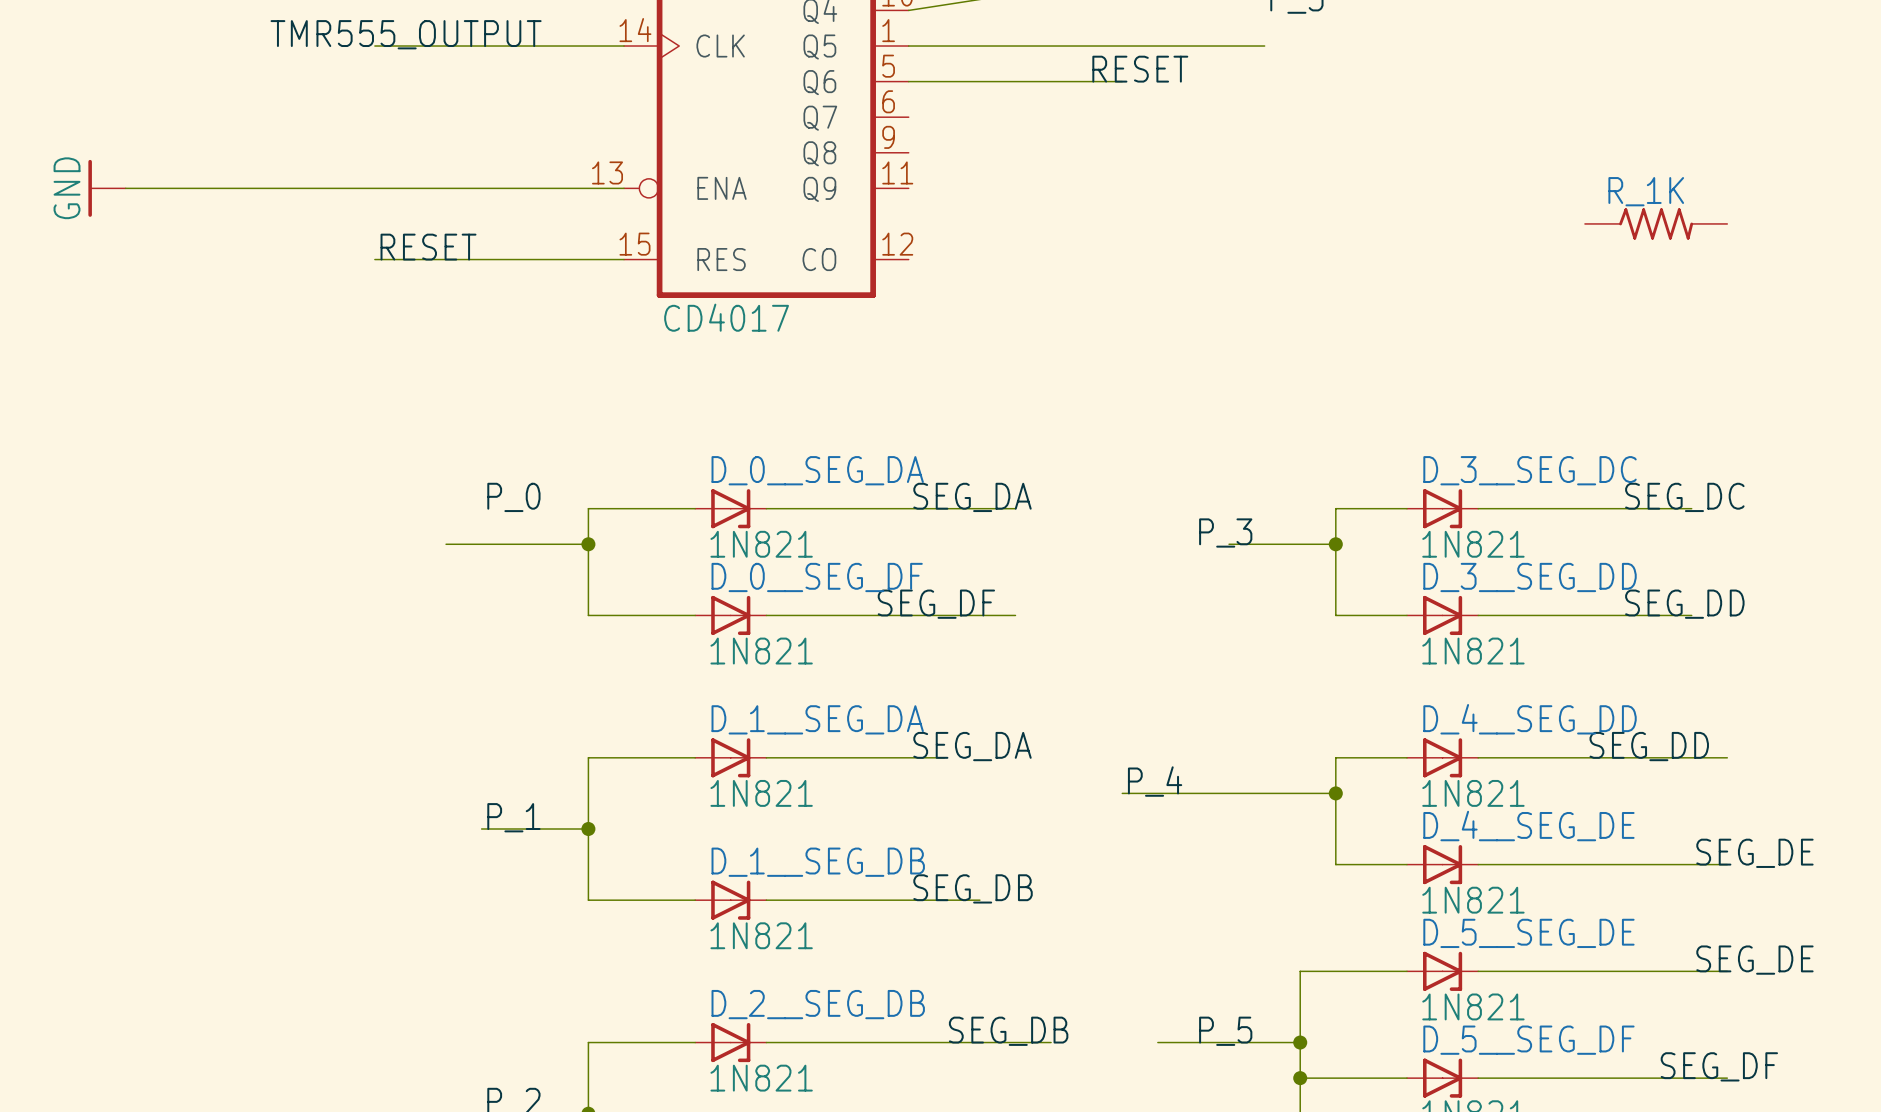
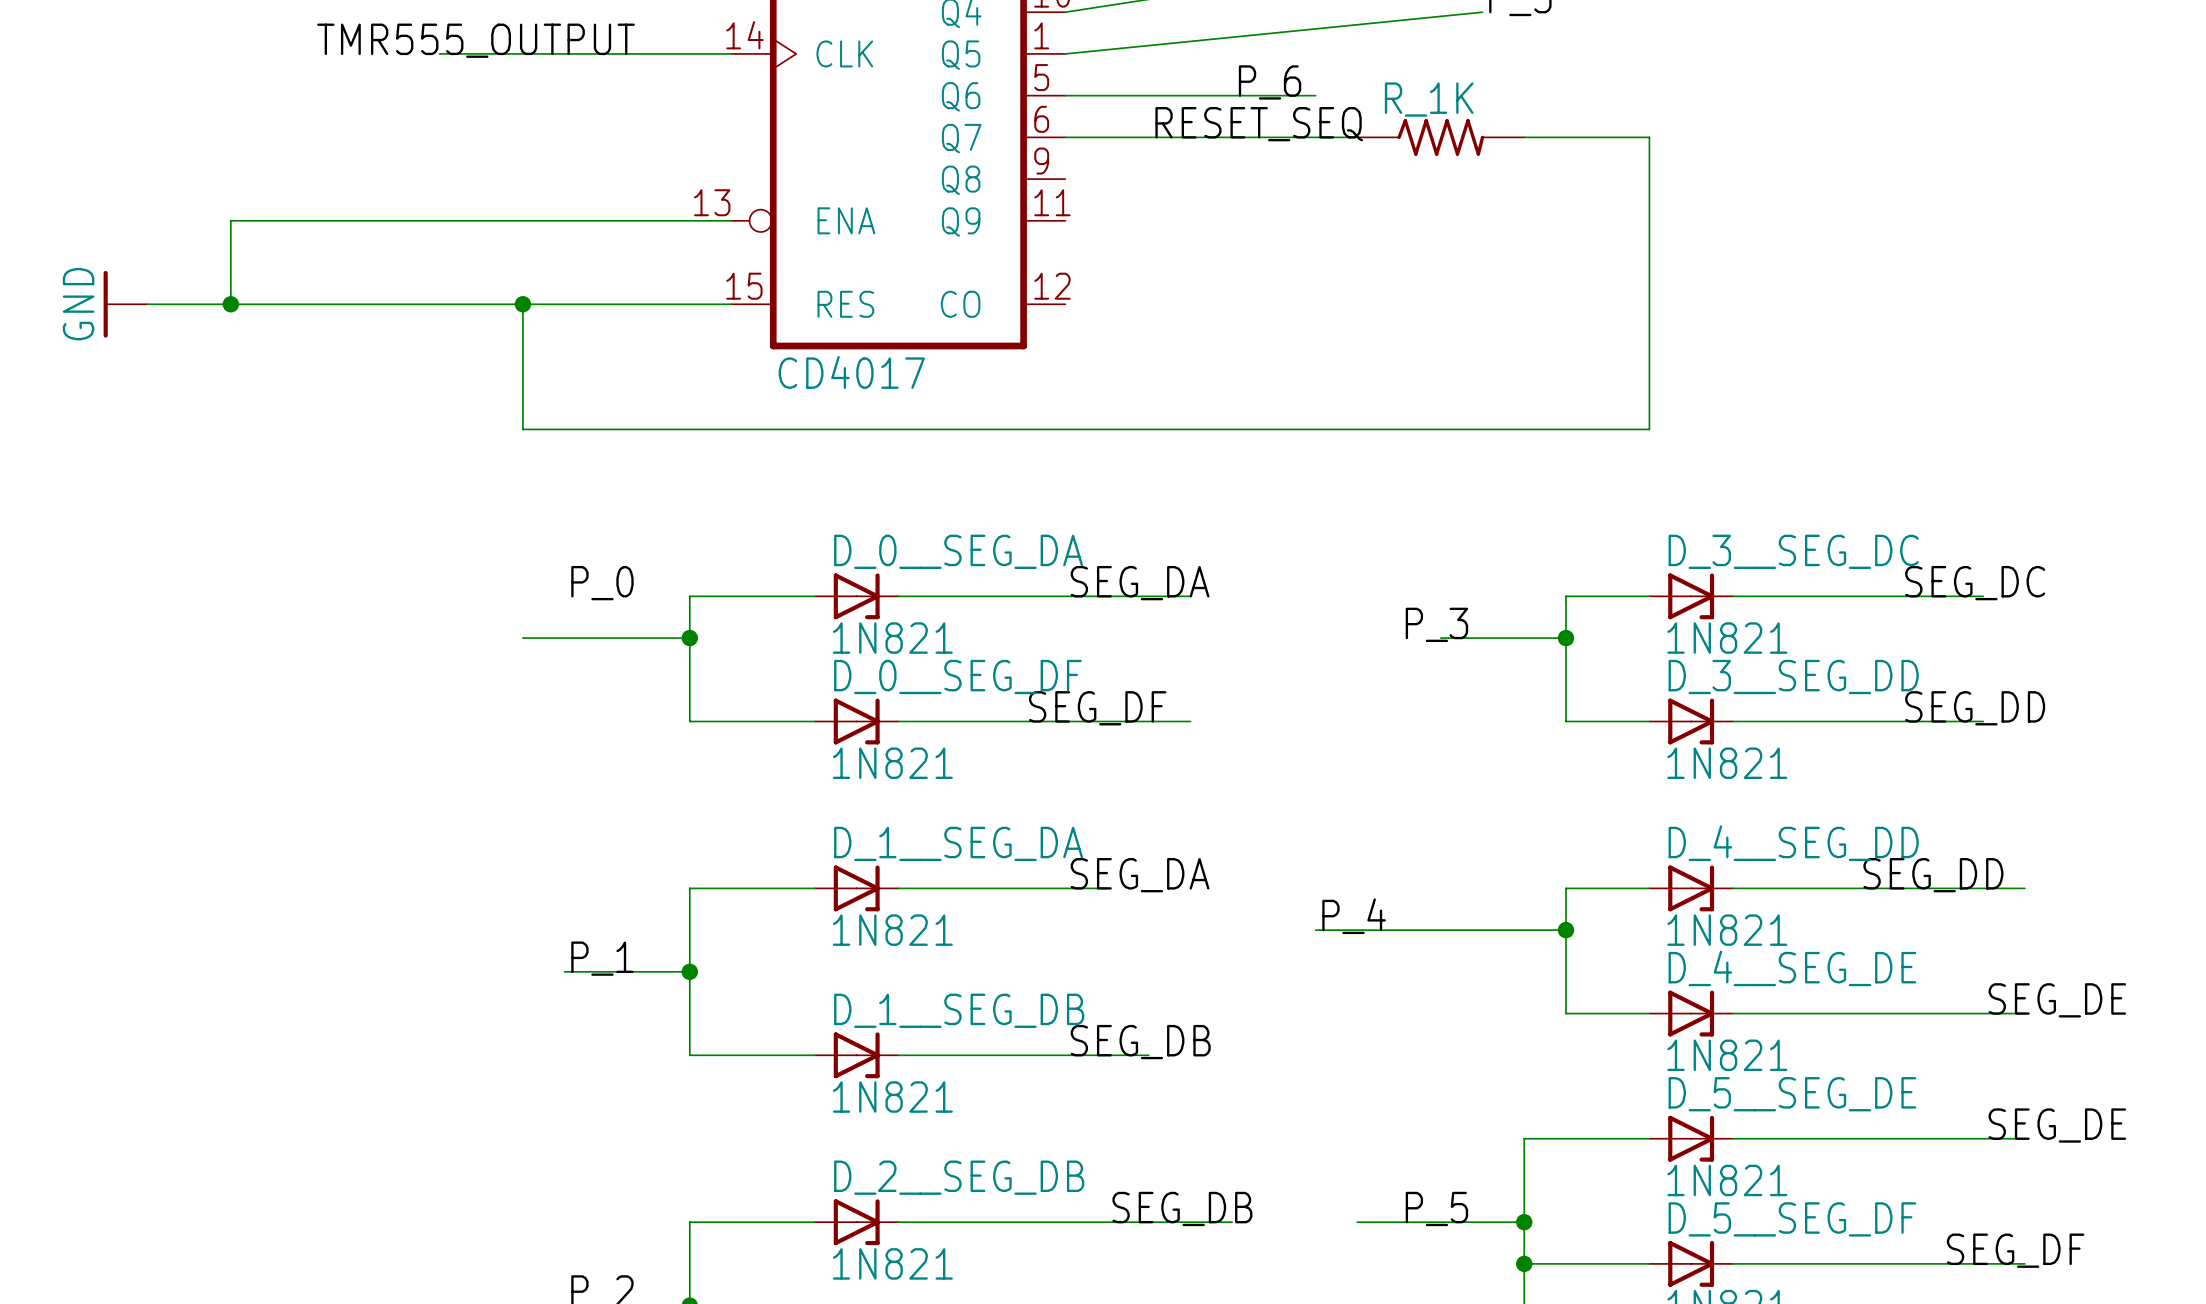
wire: (908, 46) (1264, 46) -> (1065, 53) (1482, 12)
label: RESET (1140, 69) -> RESET_SEQ (1259, 124)
label: none -> P_6 (1270, 82)
wire: none -> (1065, 137) (1357, 137)
wire: none -> (1524, 137) (1649, 137) (1649, 429) (522, 429) (522, 304)
power symbol position: GND (107, 188) -> GND (125, 304)
wire: (125, 188) (196, 188) -> (230, 304) (230, 220)
R_1K position: (1656, 223) -> (1440, 137)
label: RESET (428, 247) -> none
wire: none -> (147, 304) (439, 304)
junction: none -> (230, 304)
junction: none -> (522, 304)

